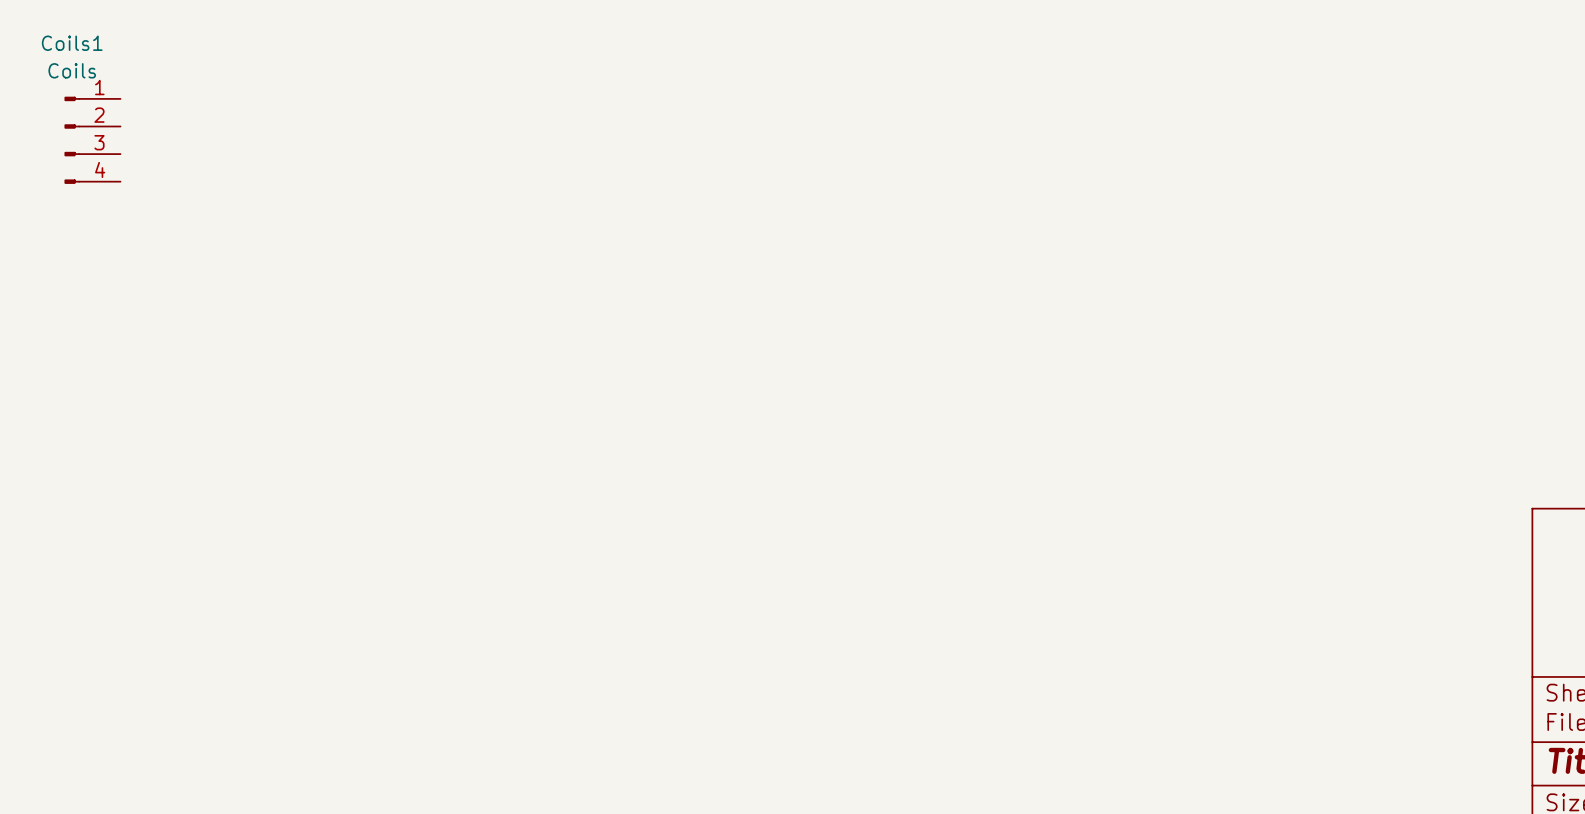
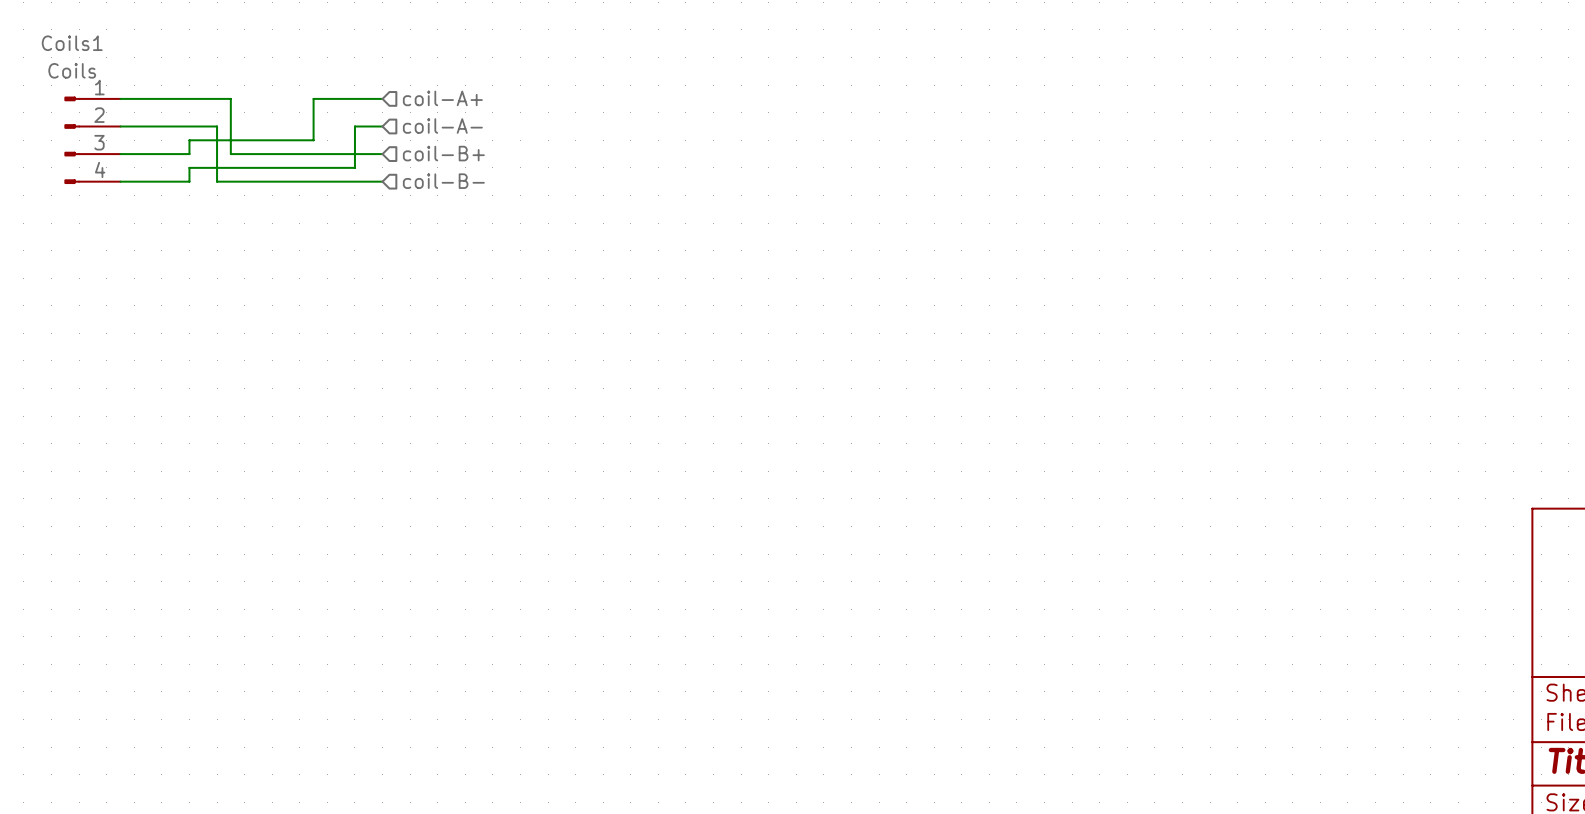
wire: none -> (120, 98) (230, 98) (230, 154) (382, 154)
wire: none -> (382, 98) (313, 98) (313, 140) (189, 140) (189, 154) (120, 154)
hierarchical label: none -> coil-A+ (442, 98)
hierarchical label: none -> coil-A- (442, 125)
wire: none -> (120, 126) (217, 126) (217, 181) (382, 181)
wire: none -> (382, 126) (354, 126) (354, 167) (189, 167) (189, 181) (120, 181)
hierarchical label: none -> coil-B+ (443, 153)
hierarchical label: none -> coil-B- (443, 181)

